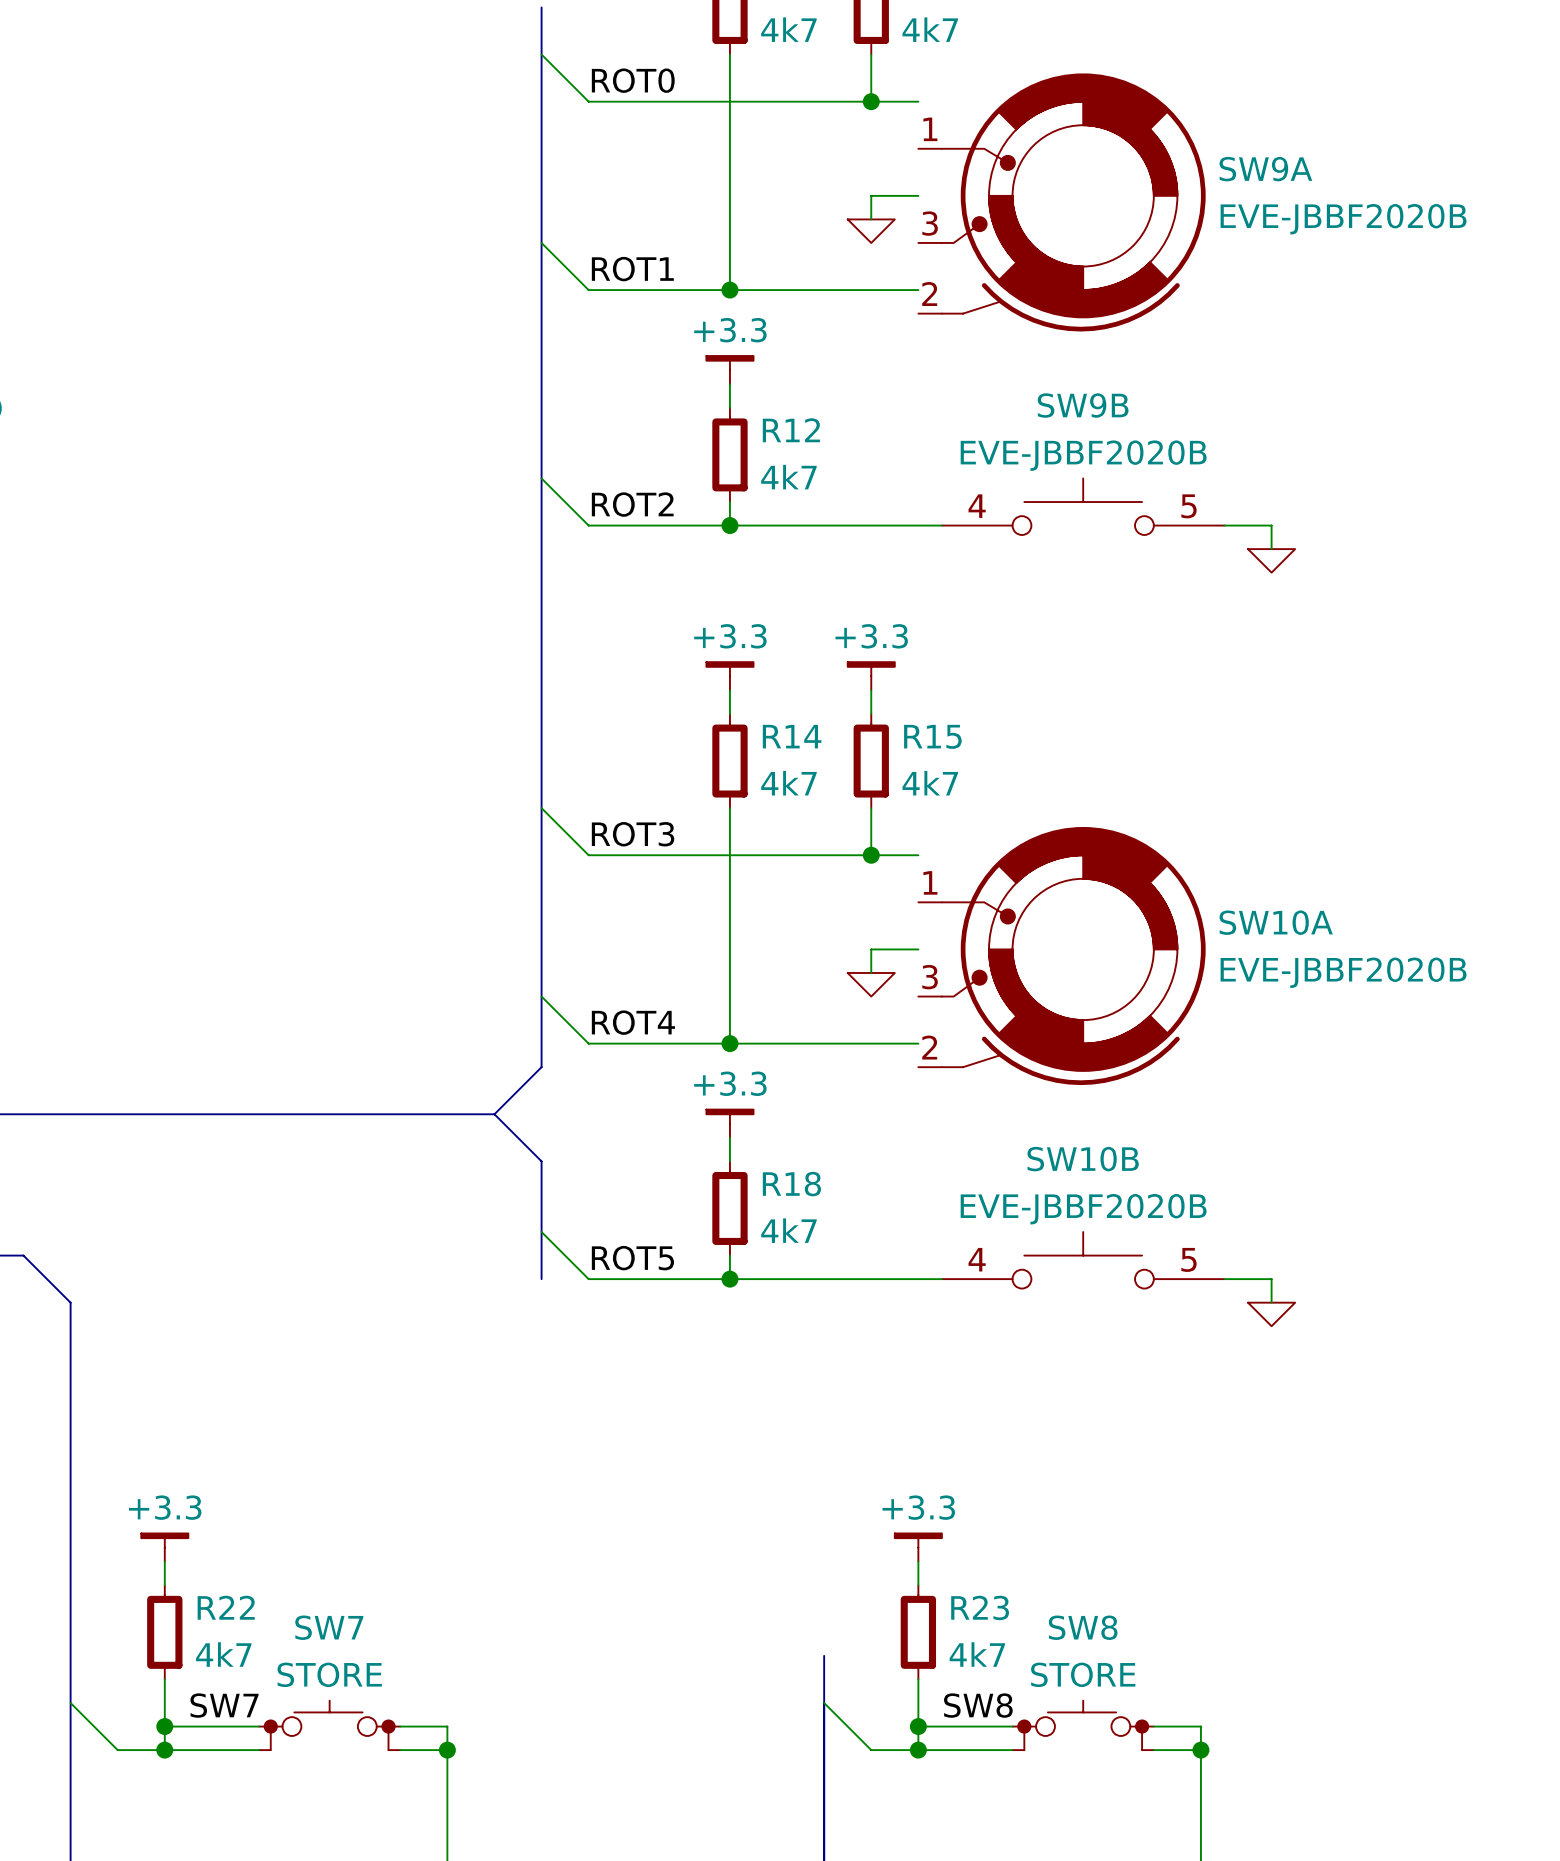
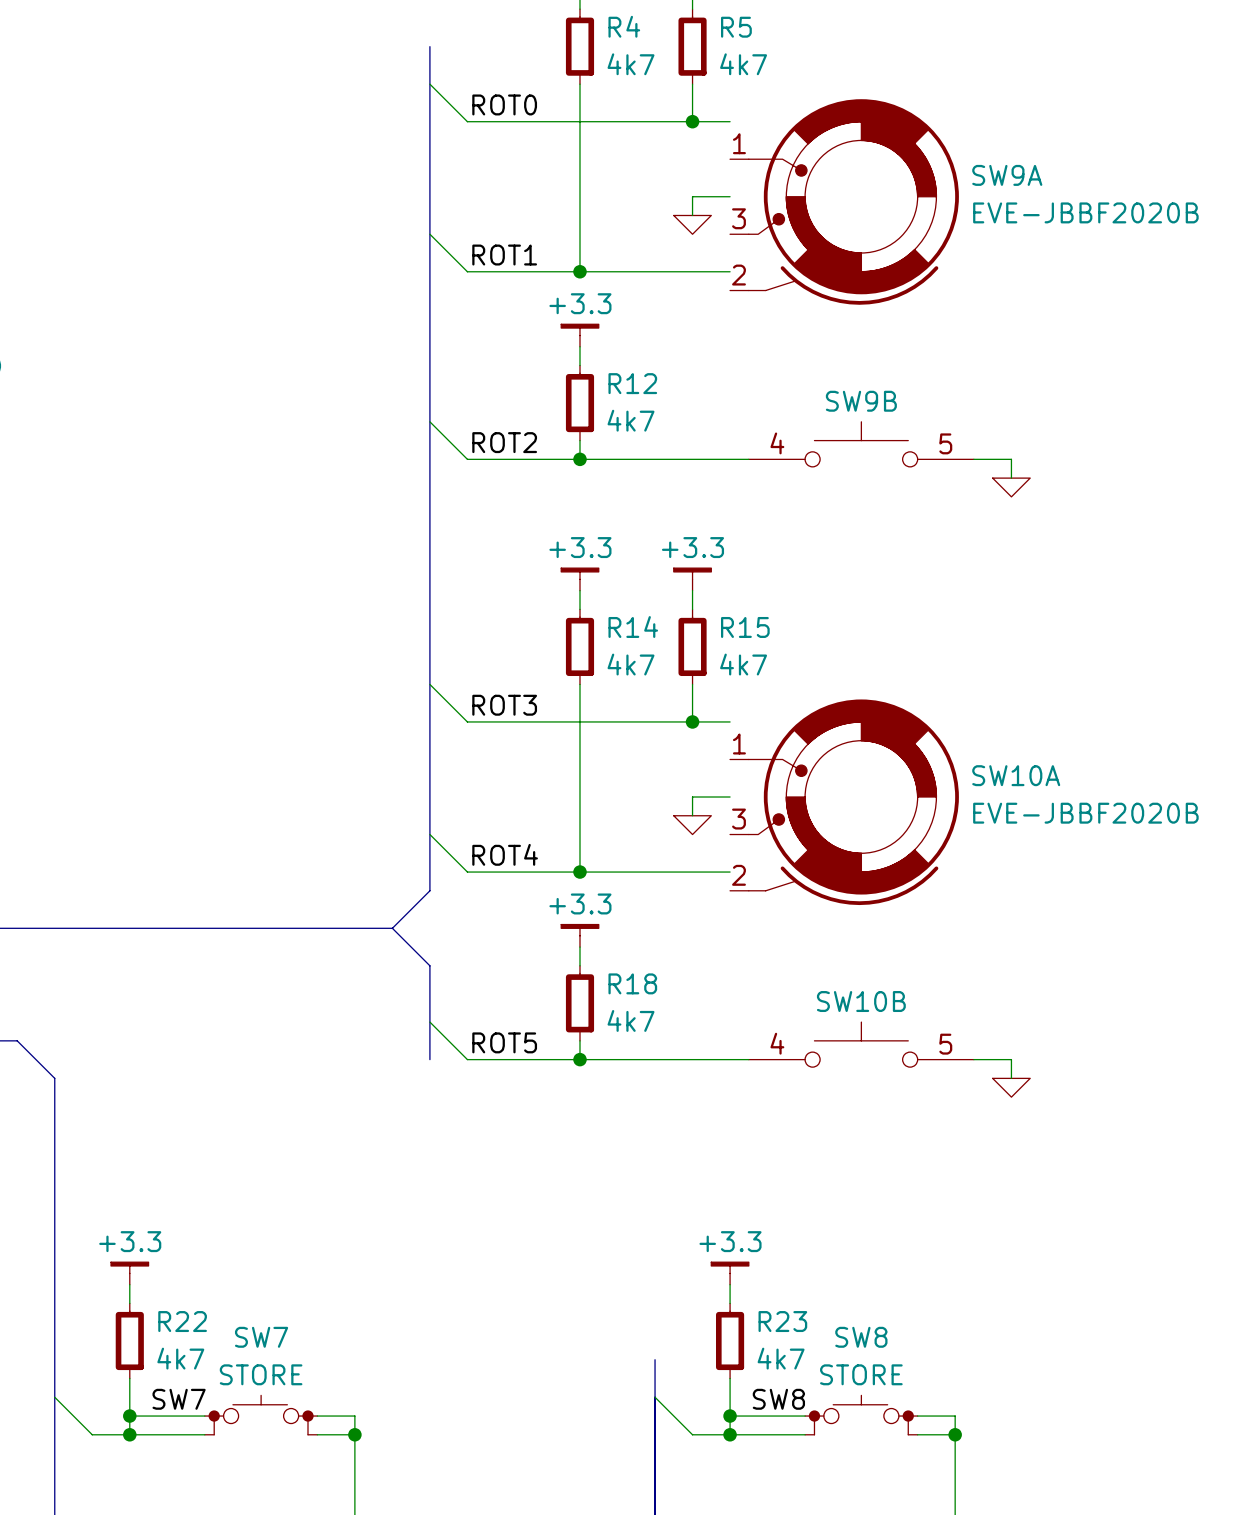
SW9B name position: SW9B (1083, 405) -> SW9B (861, 401)
SW9B value: EVE-JBBF2020B (1083, 455) -> none
SW10B name position: SW10B (1083, 1159) -> SW10B (861, 1001)
SW10B value: EVE-JBBF2020B (1083, 1209) -> none

